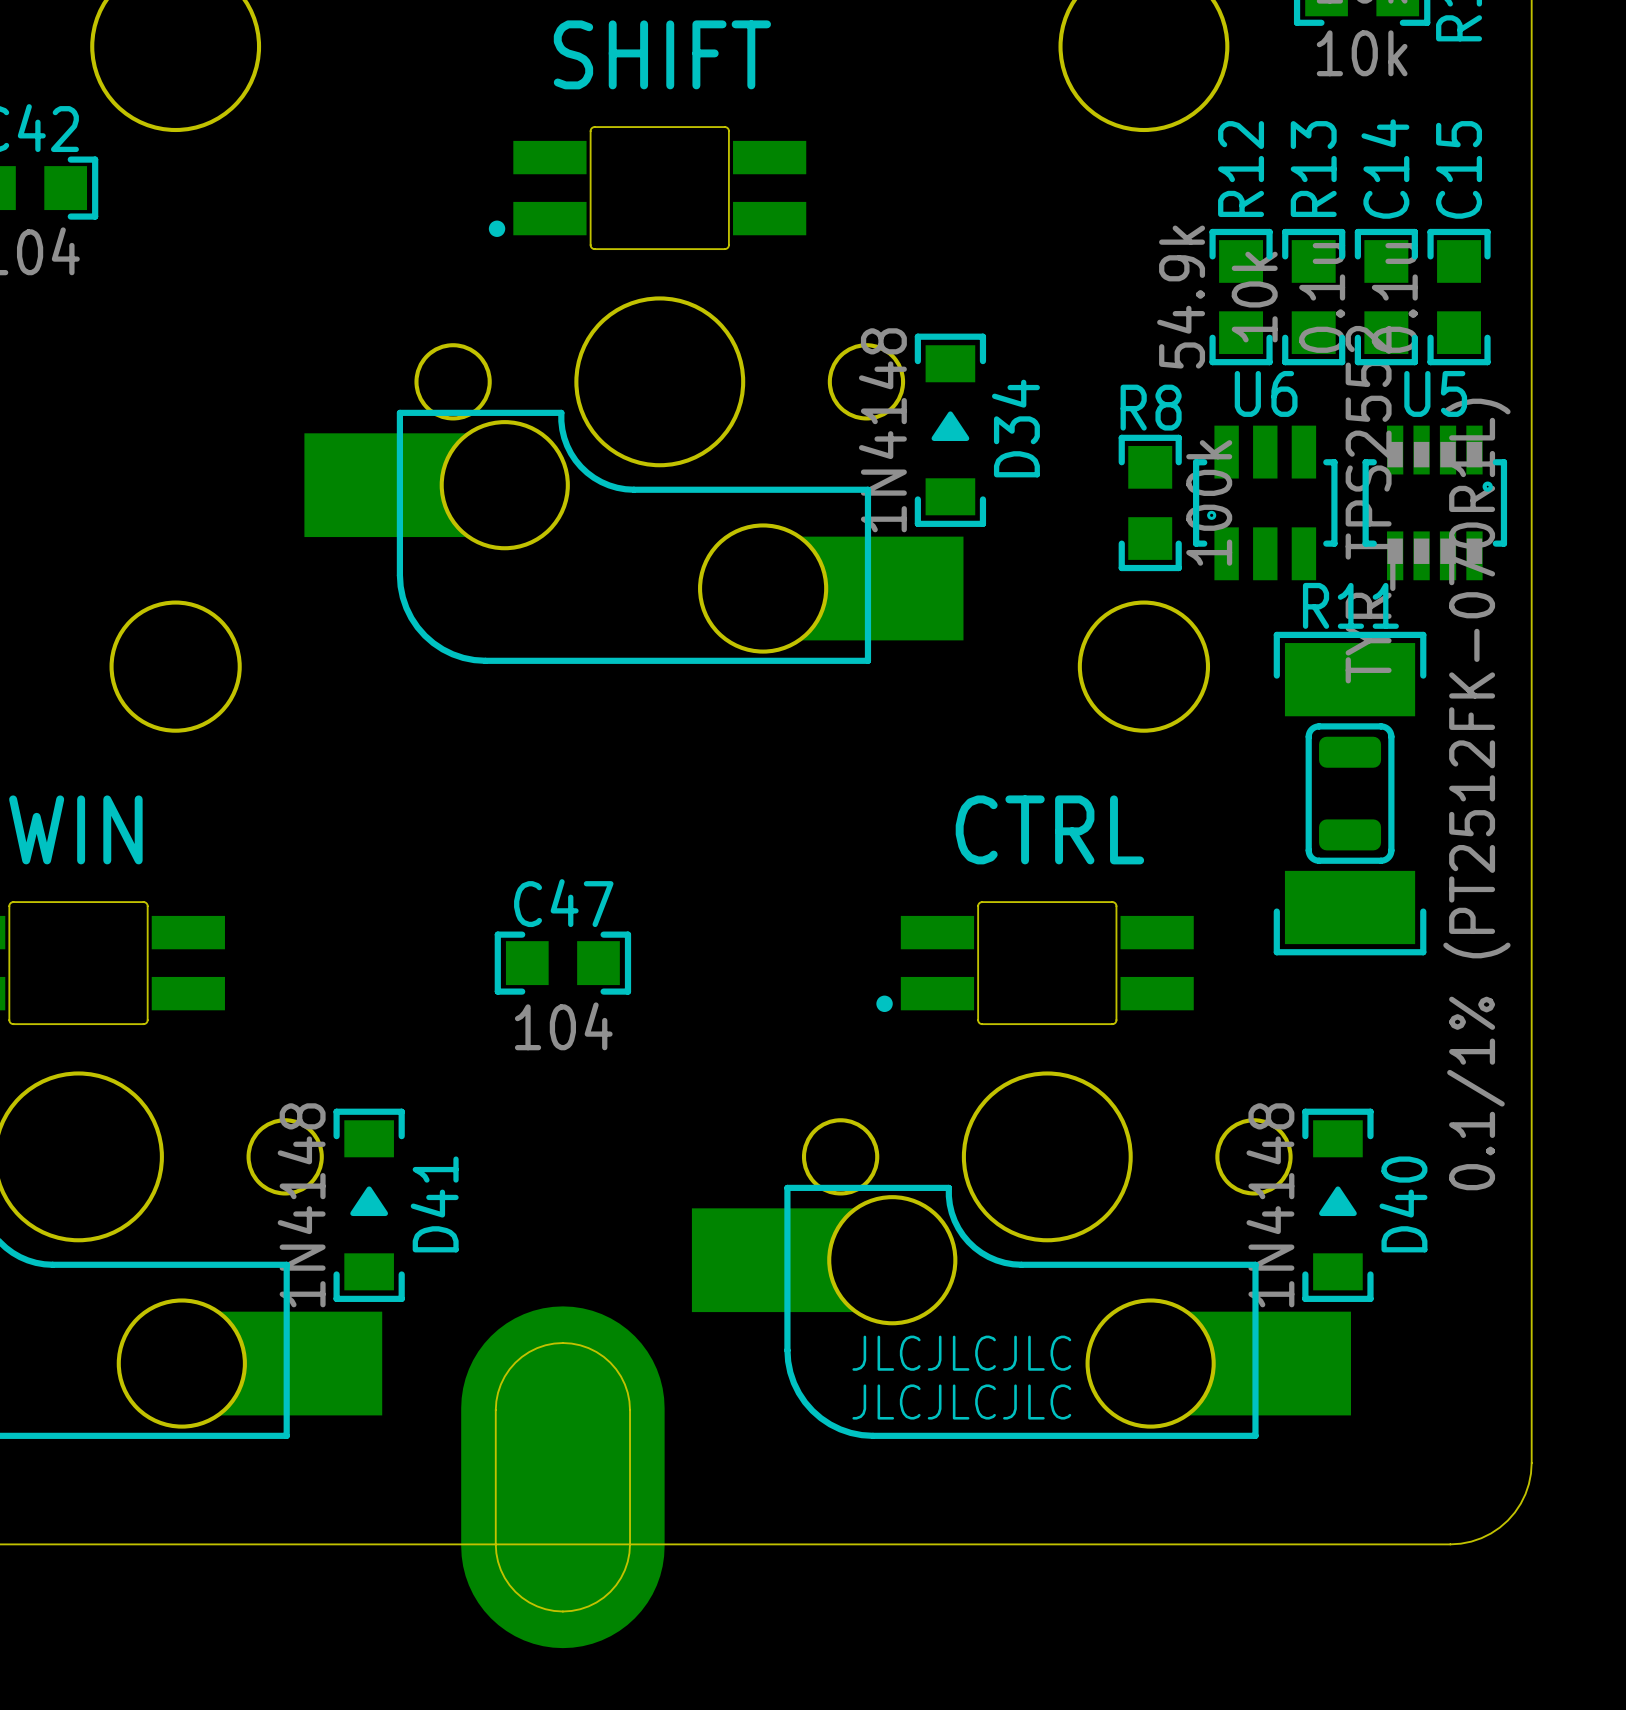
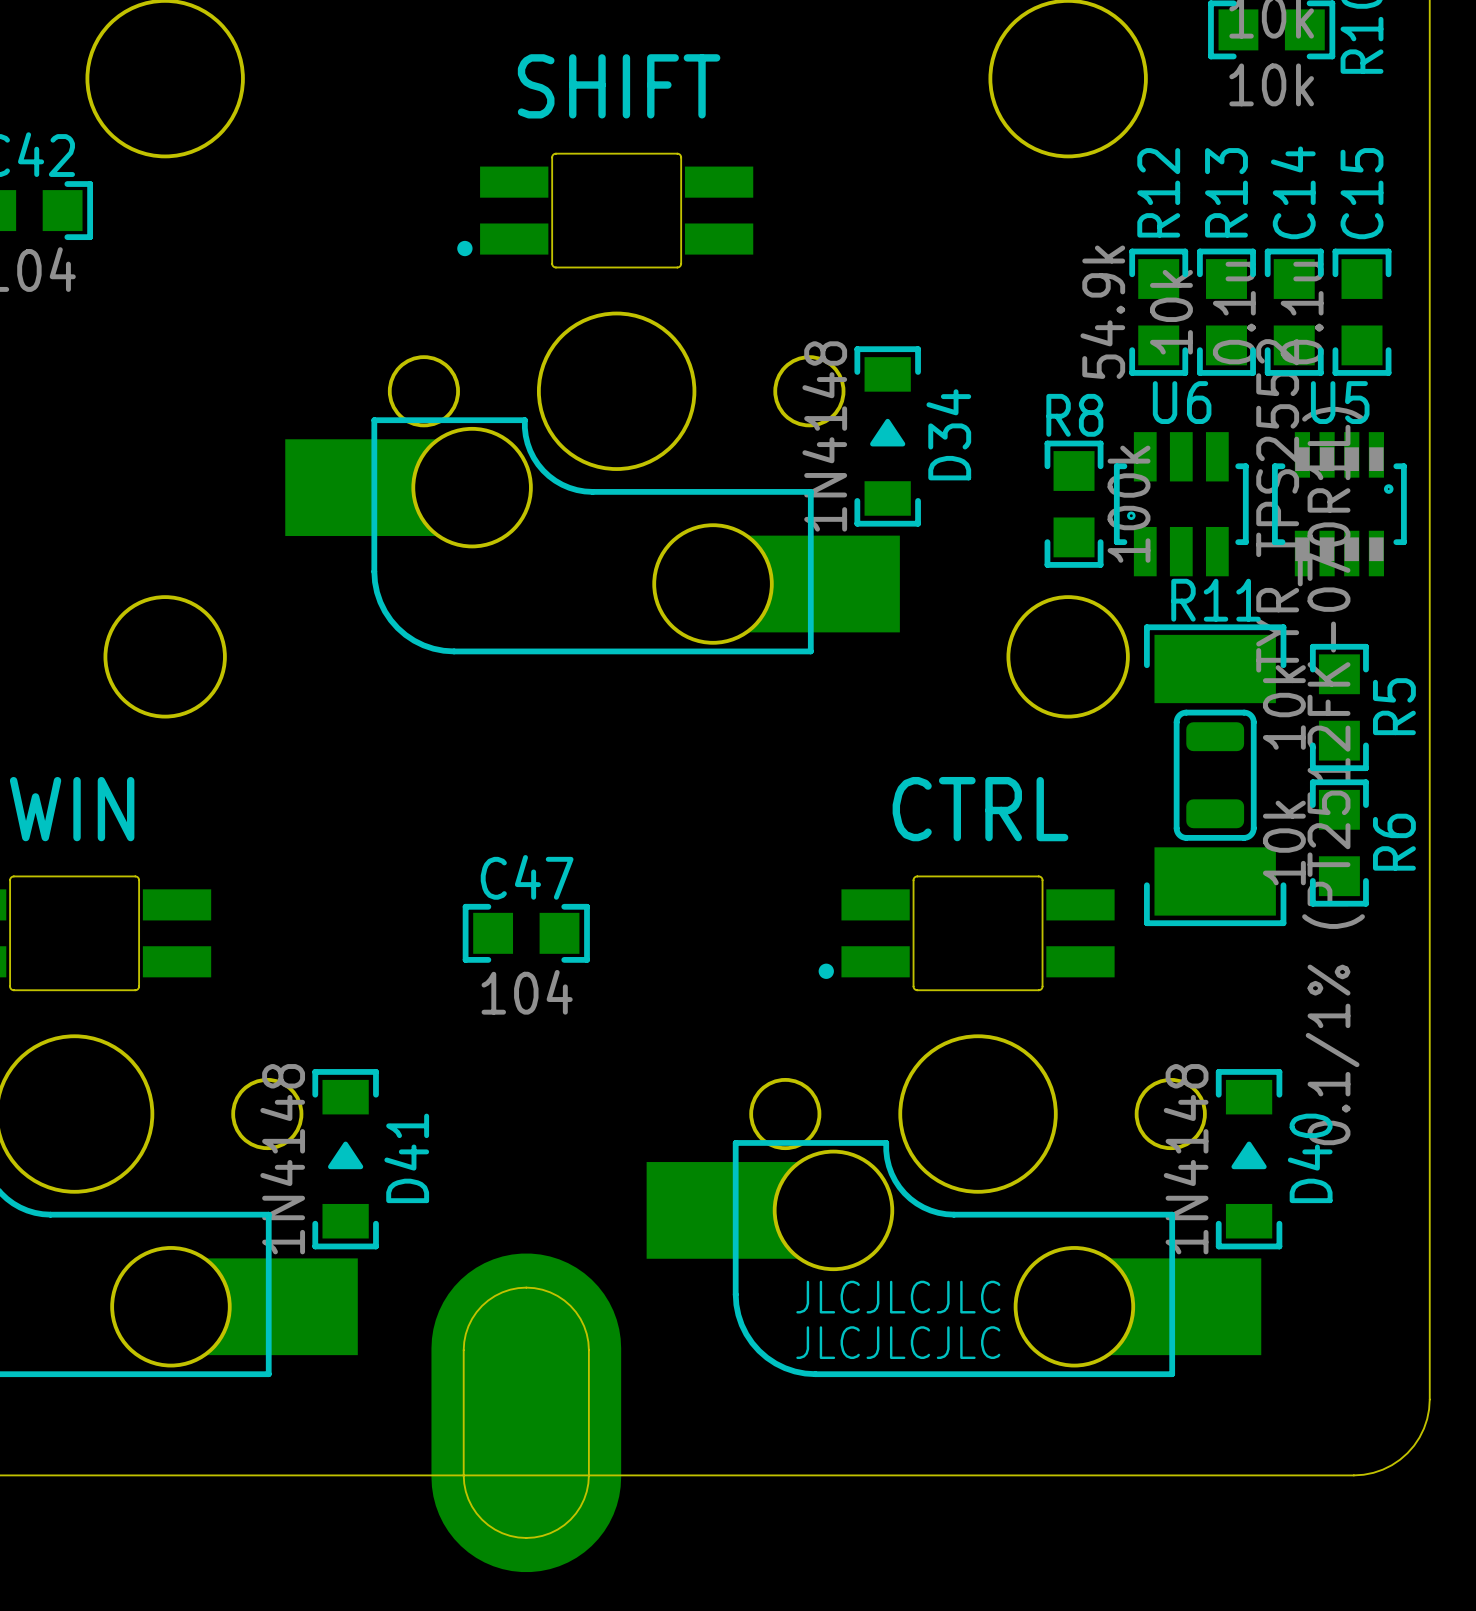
R5: none -> 10k (1339, 707)
R11 position: (1350, 793) -> (1215, 775)
part position: (1350, 793) -> (1215, 775)
R6: none -> 10k (1339, 842)

